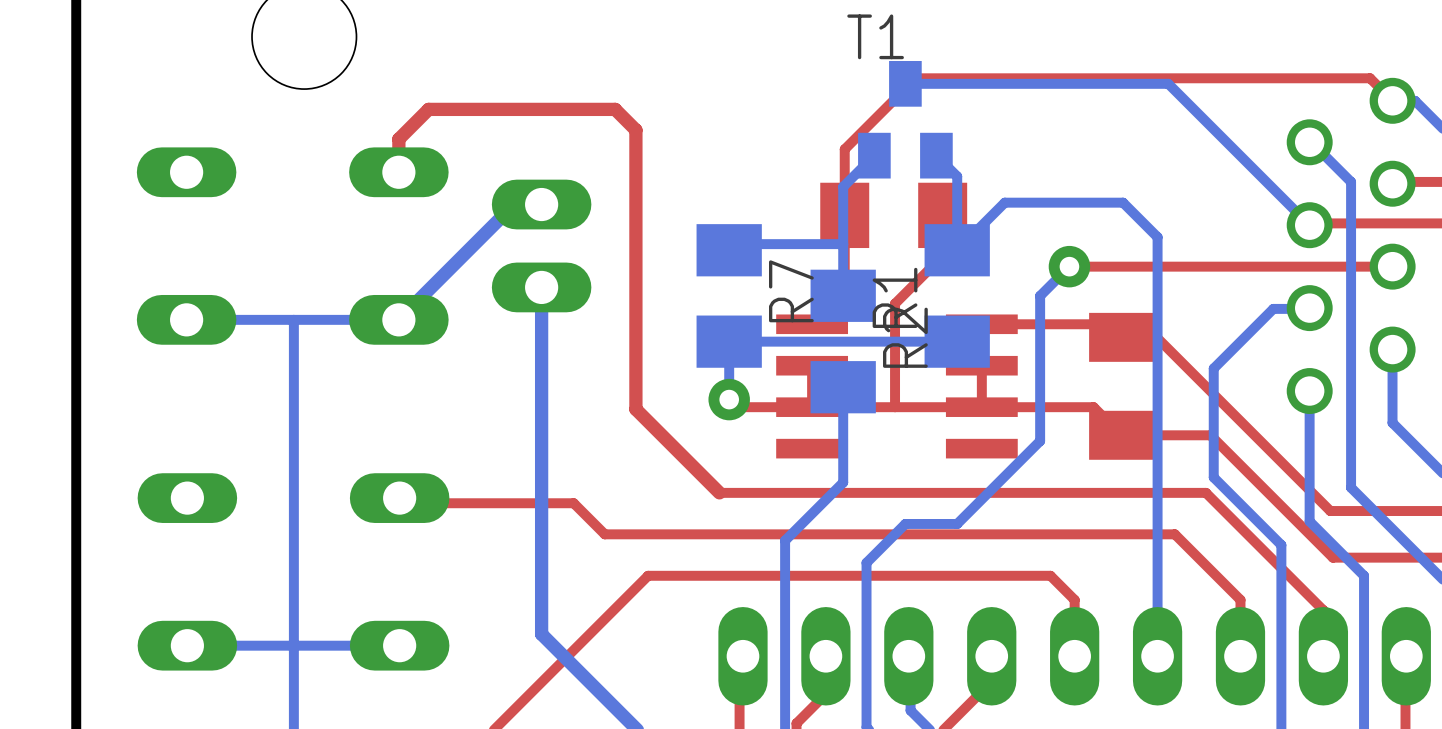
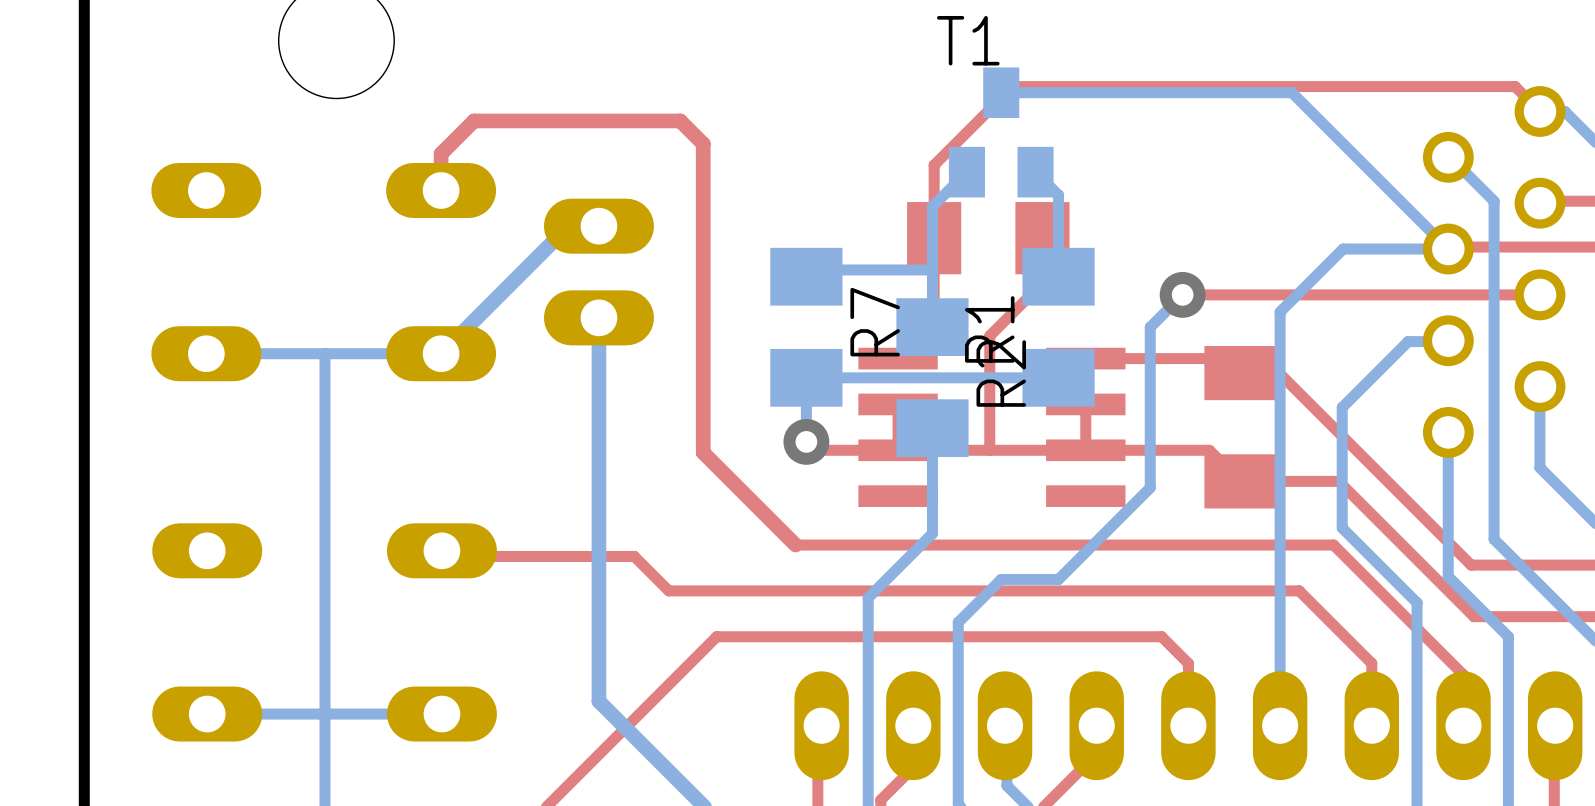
bottom track: (957, 250) (1004, 202) (1123, 202) (1157, 237) (1157, 282) -> (1448, 249) (1343, 249) (1280, 312)

